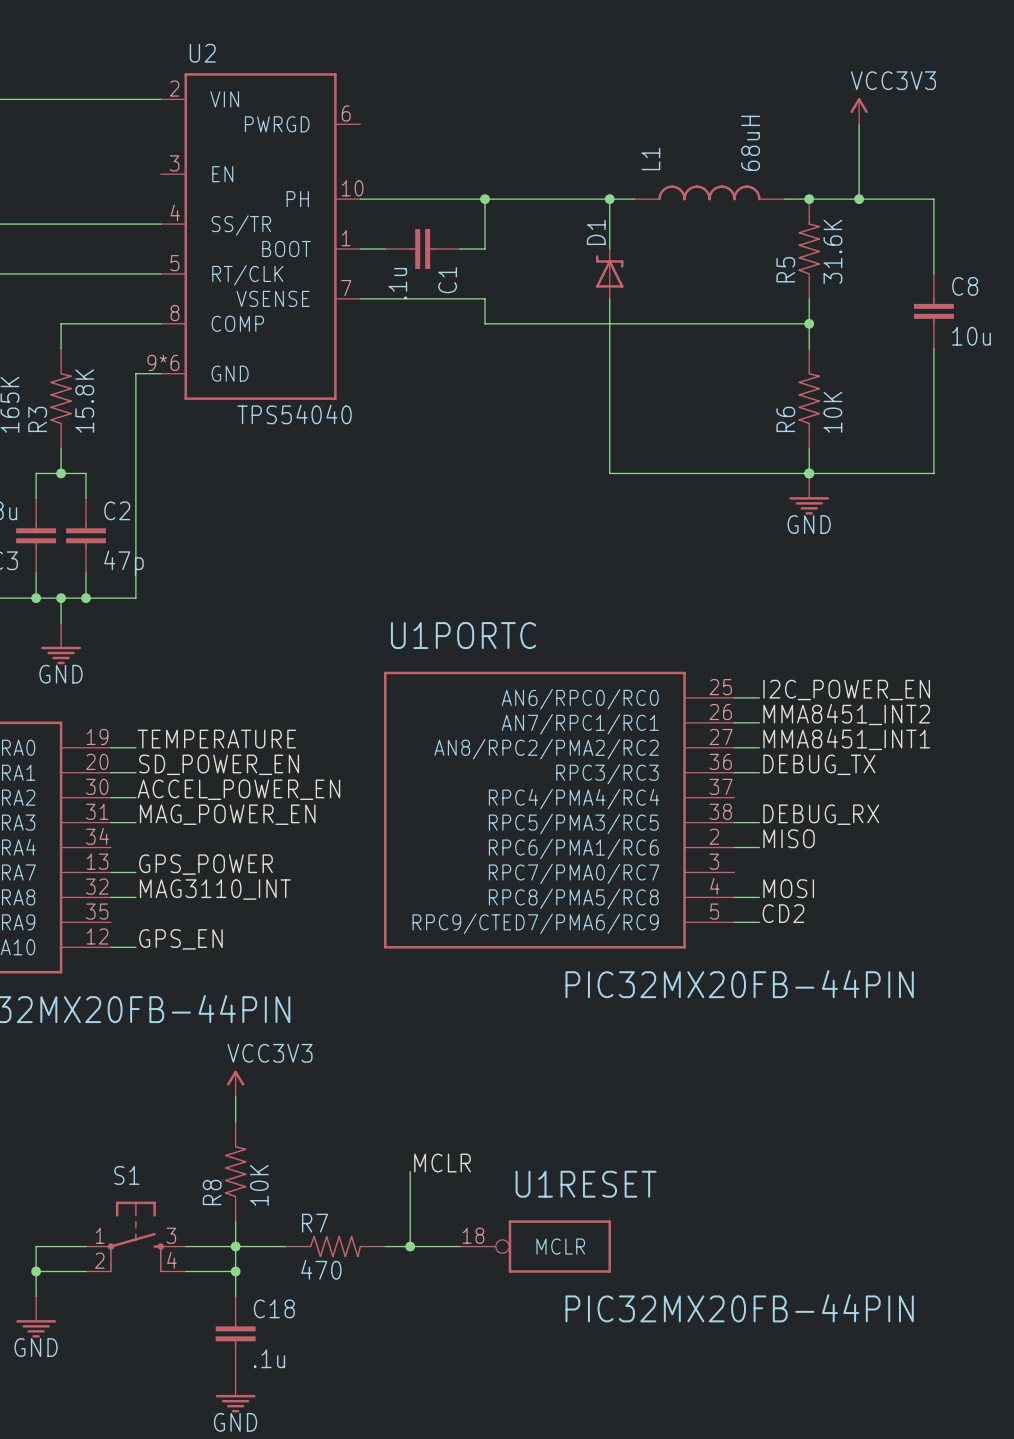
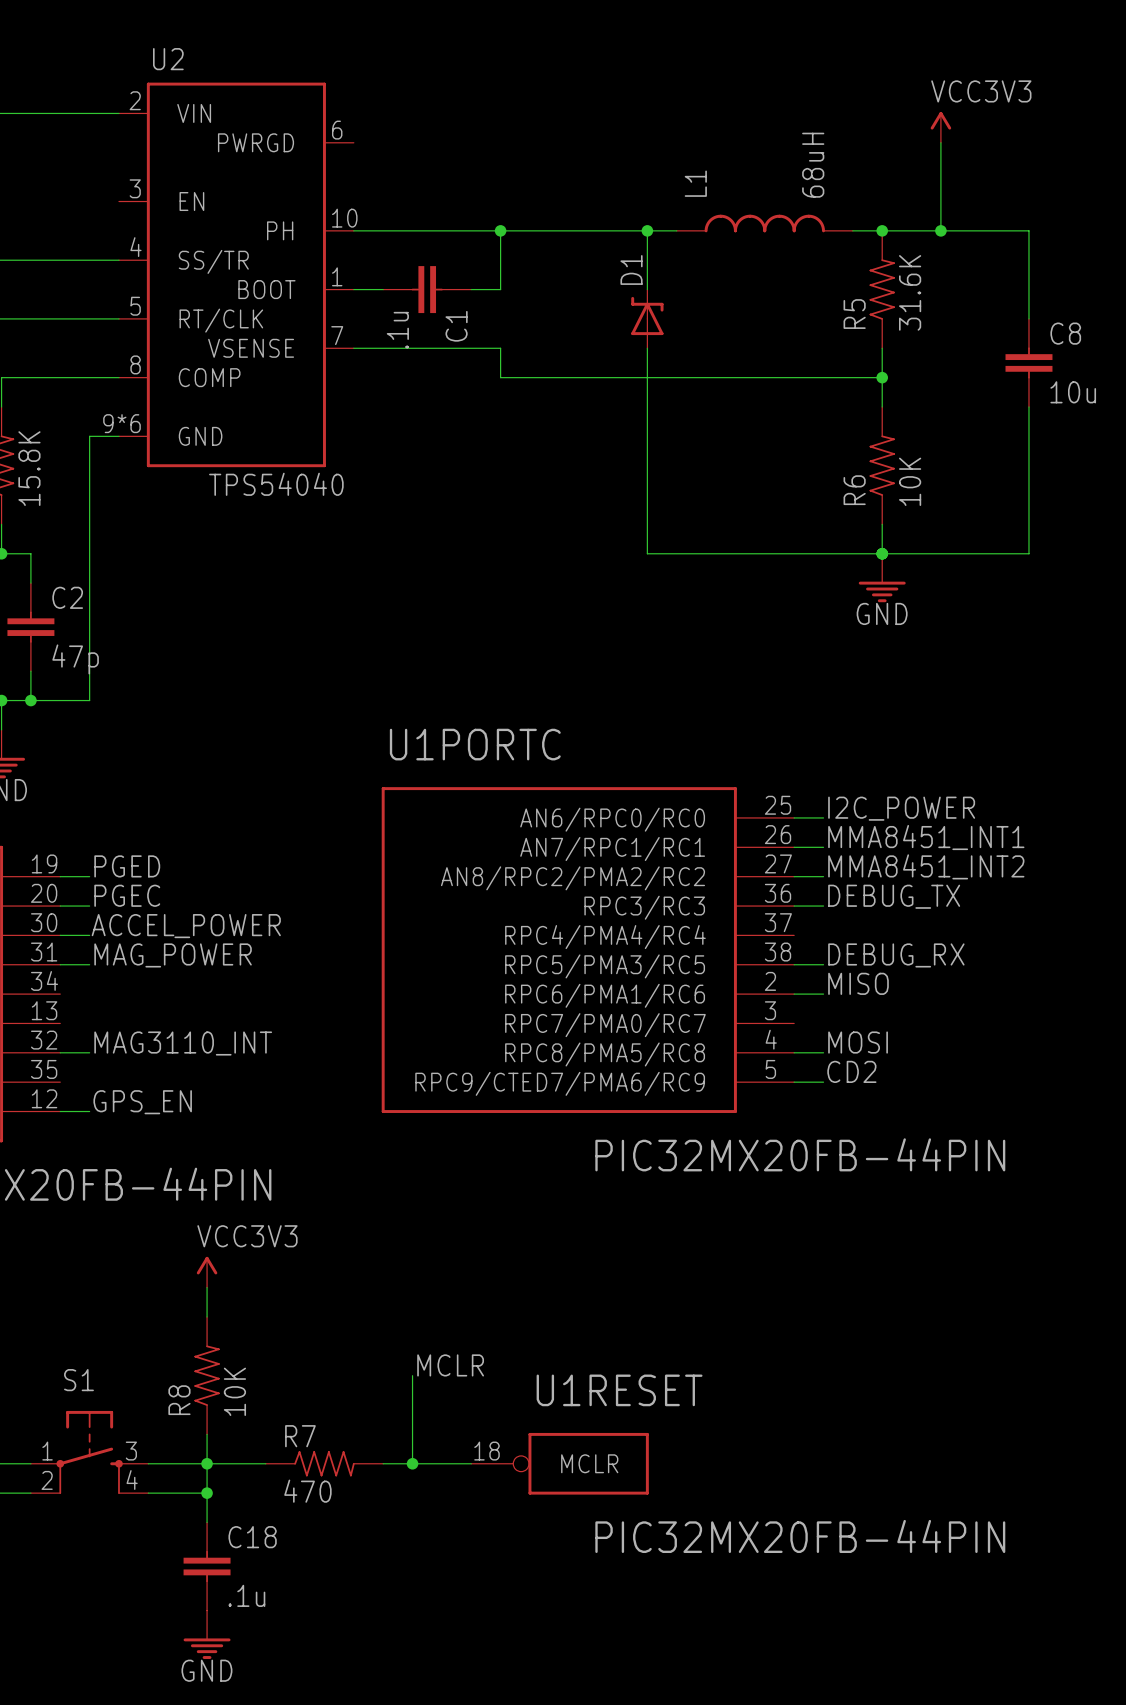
label: I2C_POWER_EN (846, 690) -> I2C_POWER (901, 808)
label: MMA8451_INT2 (846, 714) -> MMA8451_INT1 (926, 837)
label: TEMPERATURE (216, 739) -> PGED (127, 866)
label: MMA8451_INT1 (846, 739) -> MMA8451_INT2 (926, 866)
label: SD_POWER_EN (219, 764) -> PGEC (127, 895)
label: ACCEL_POWER_EN (238, 789) -> ACCEL_POWER (186, 926)
label: MAG_POWER_EN (227, 814) -> MAG_POWER (173, 955)
label: GPS_POWER (206, 864) -> none
wire: (110, 872) (135, 872) -> none

